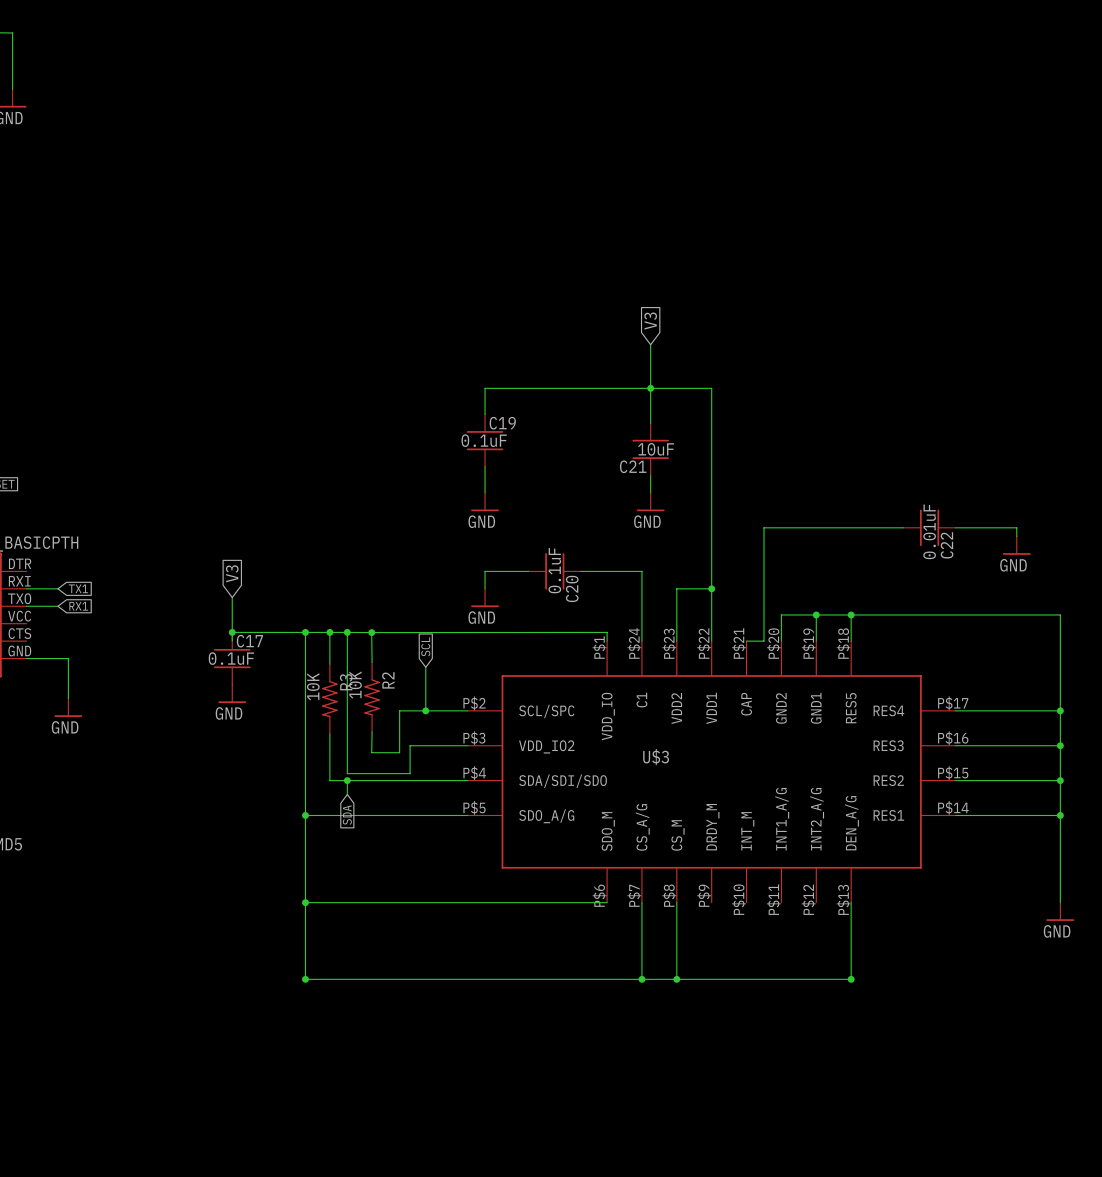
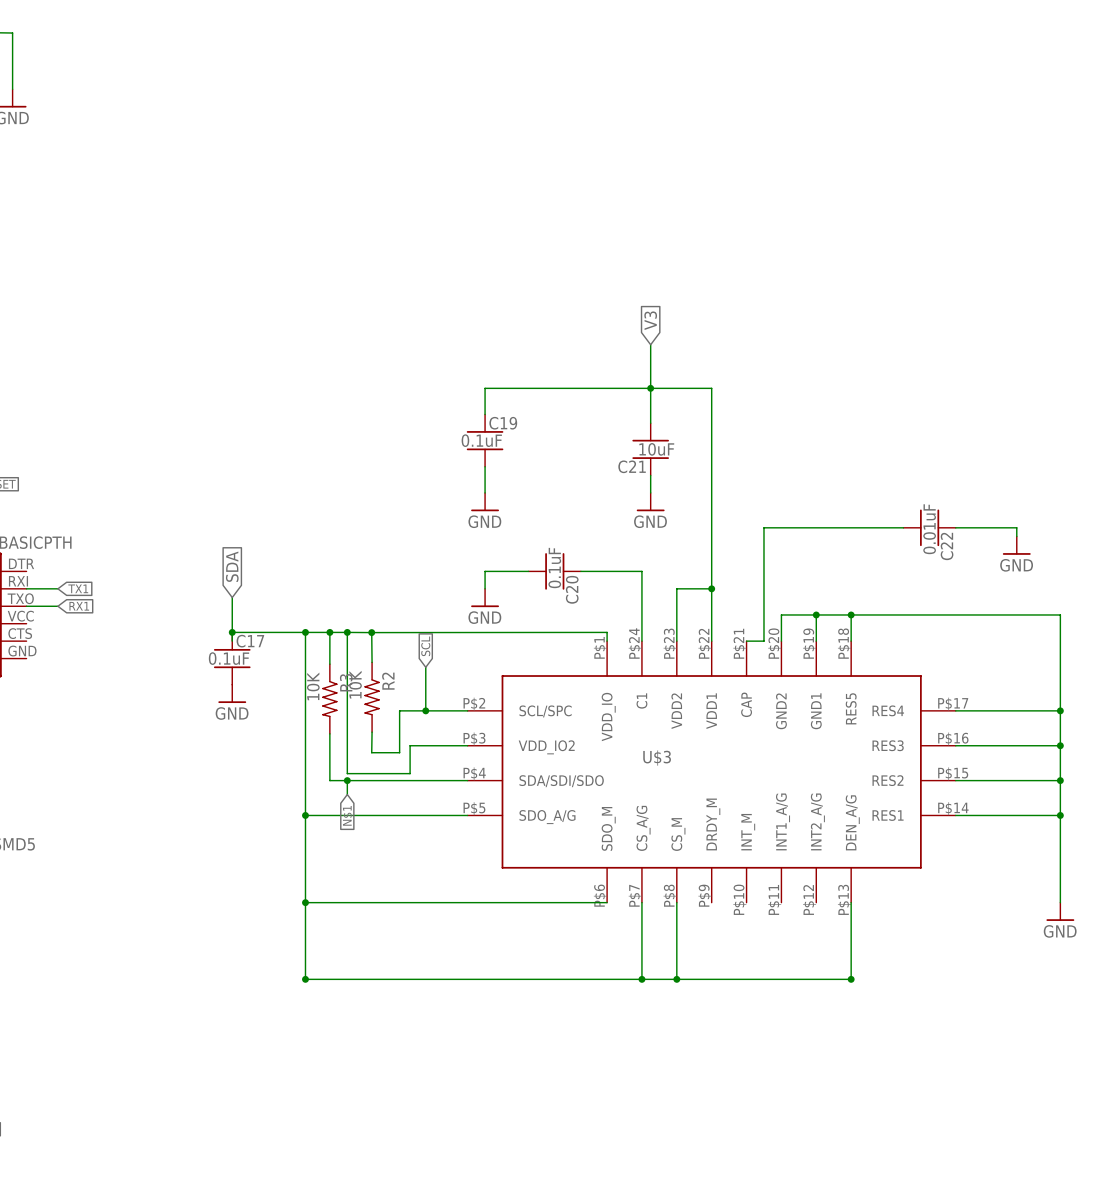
global label: V3 (232, 573) -> SDA (232, 566)
wire: (26, 658) (68, 658) (68, 698) -> none
power symbol: GND (68, 707) -> none
global label: SDA (347, 815) -> N$1 (348, 815)

